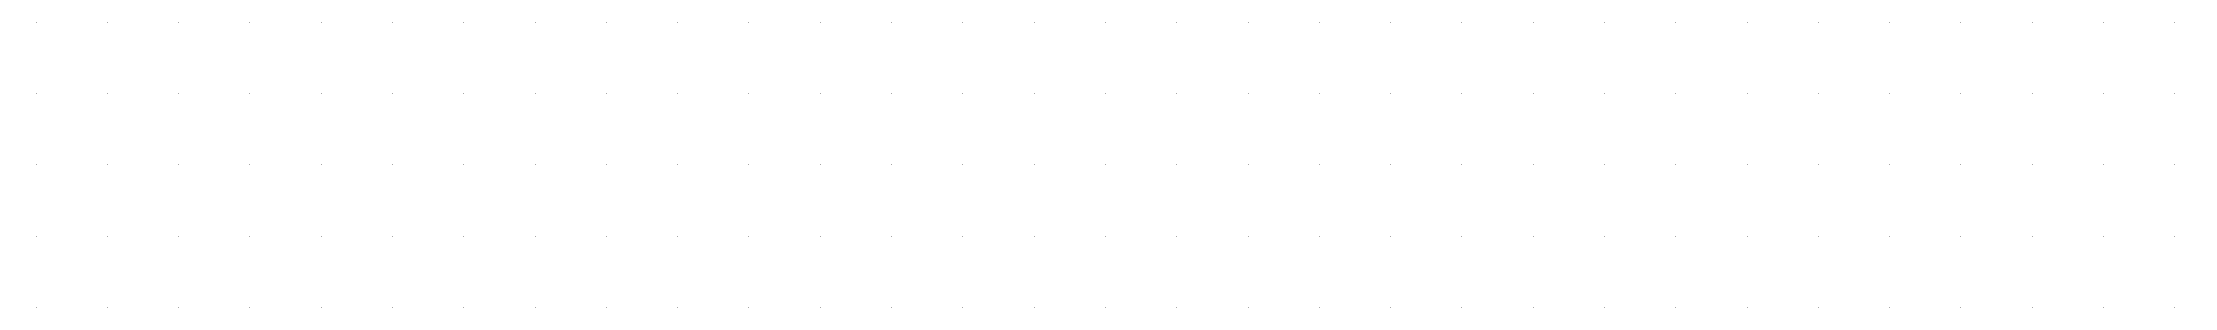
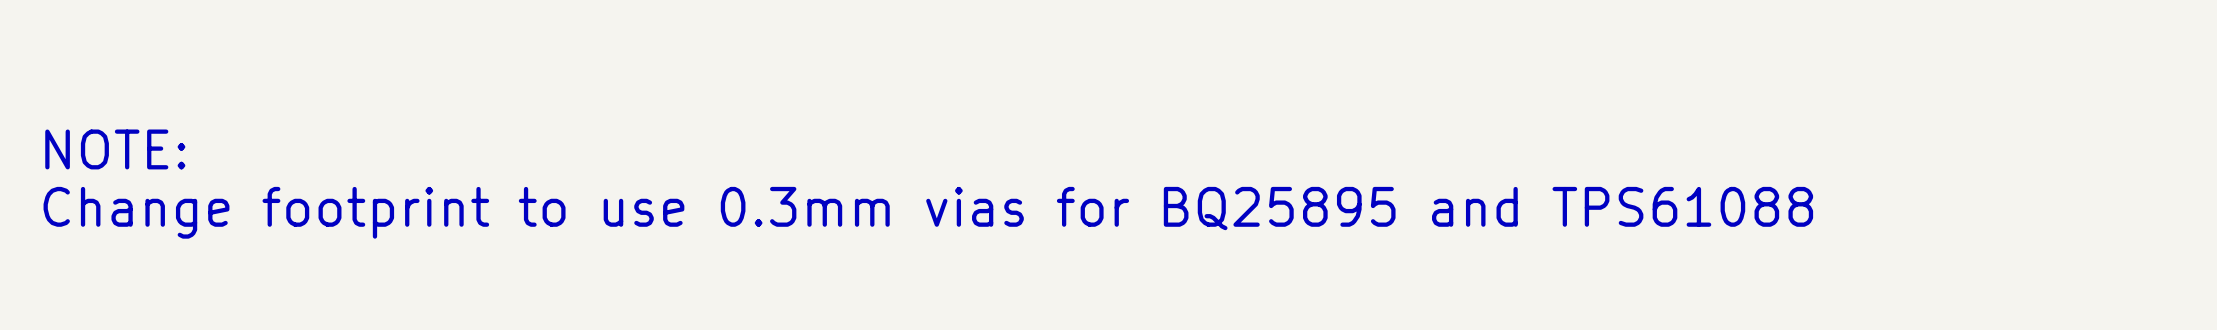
text: none -> NOTE: (115, 149)
text: none -> Change footprint to use 0.3mm vias for BQ25895 and TPS61088 (928, 212)

